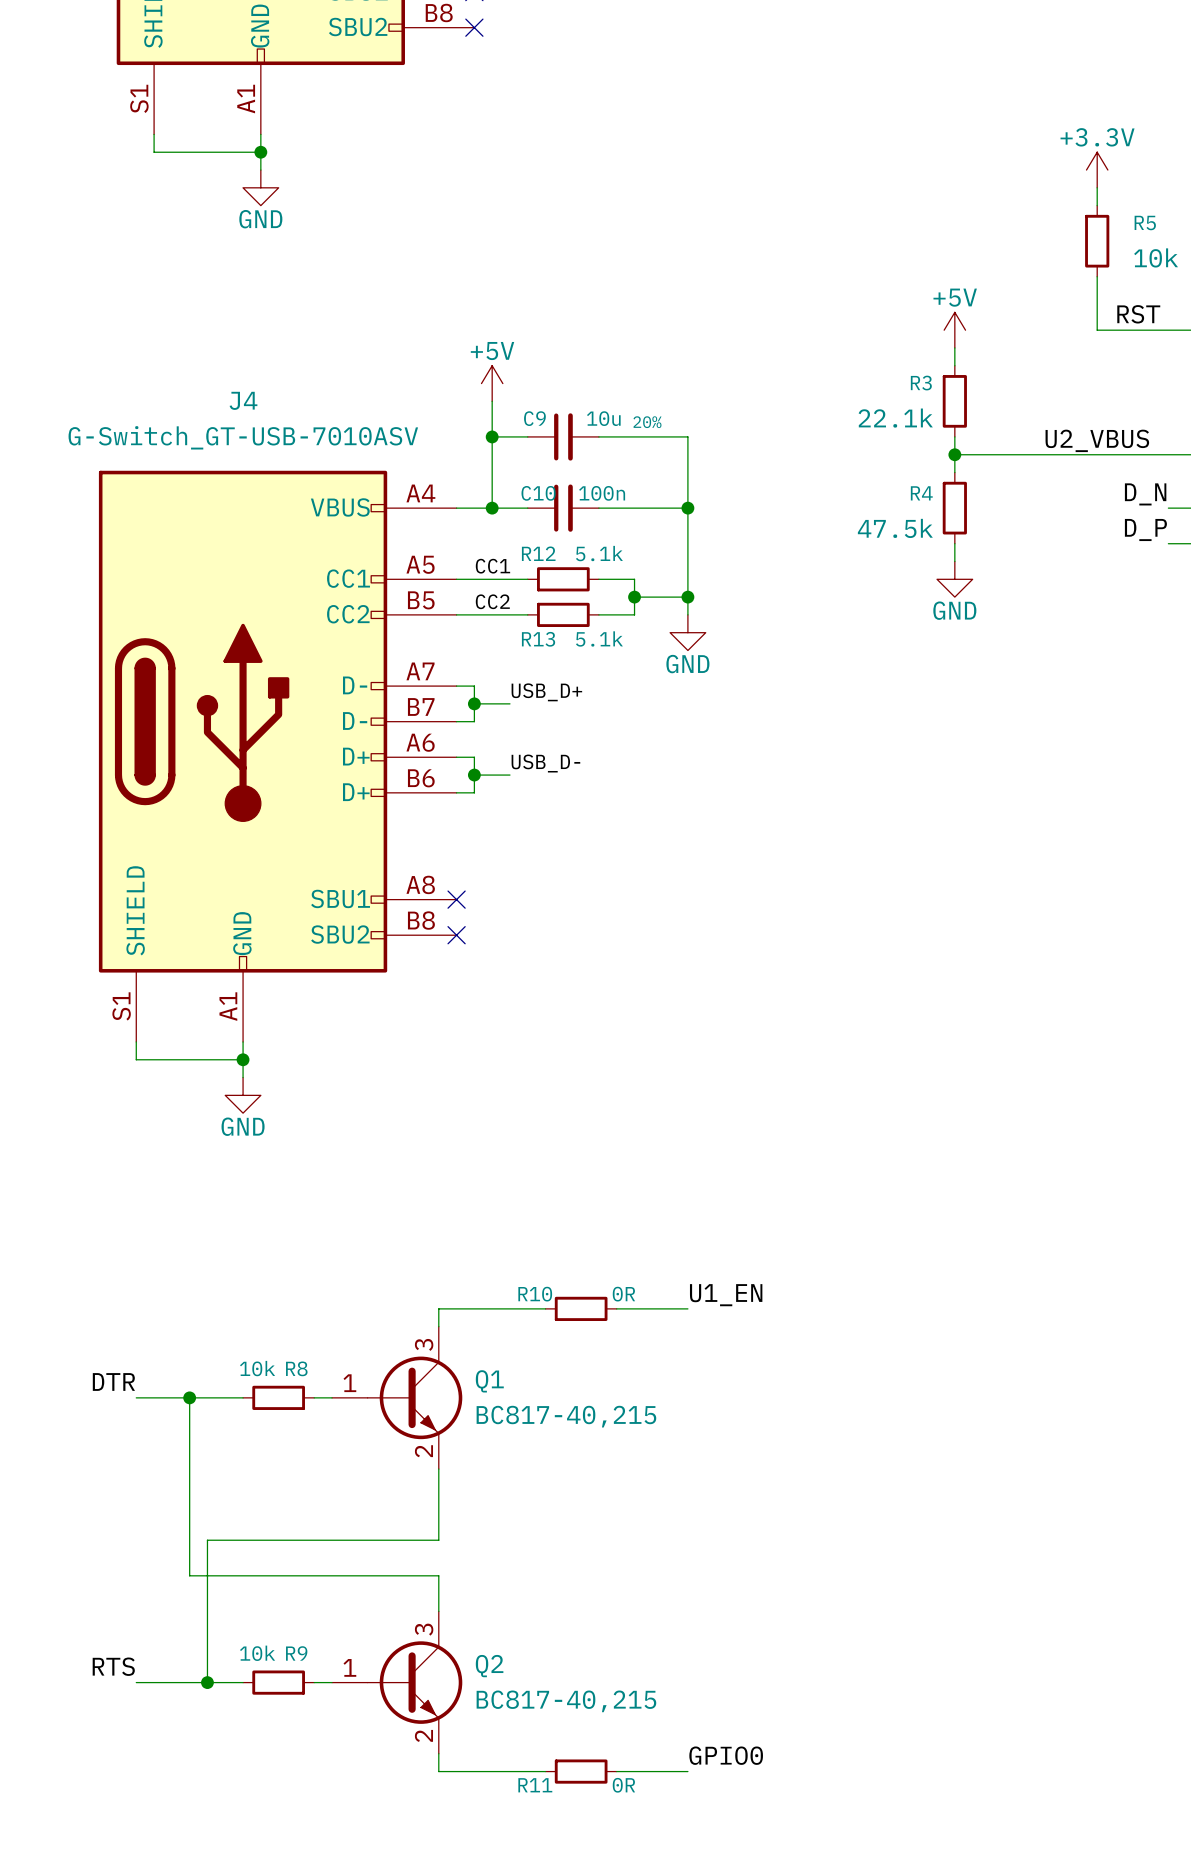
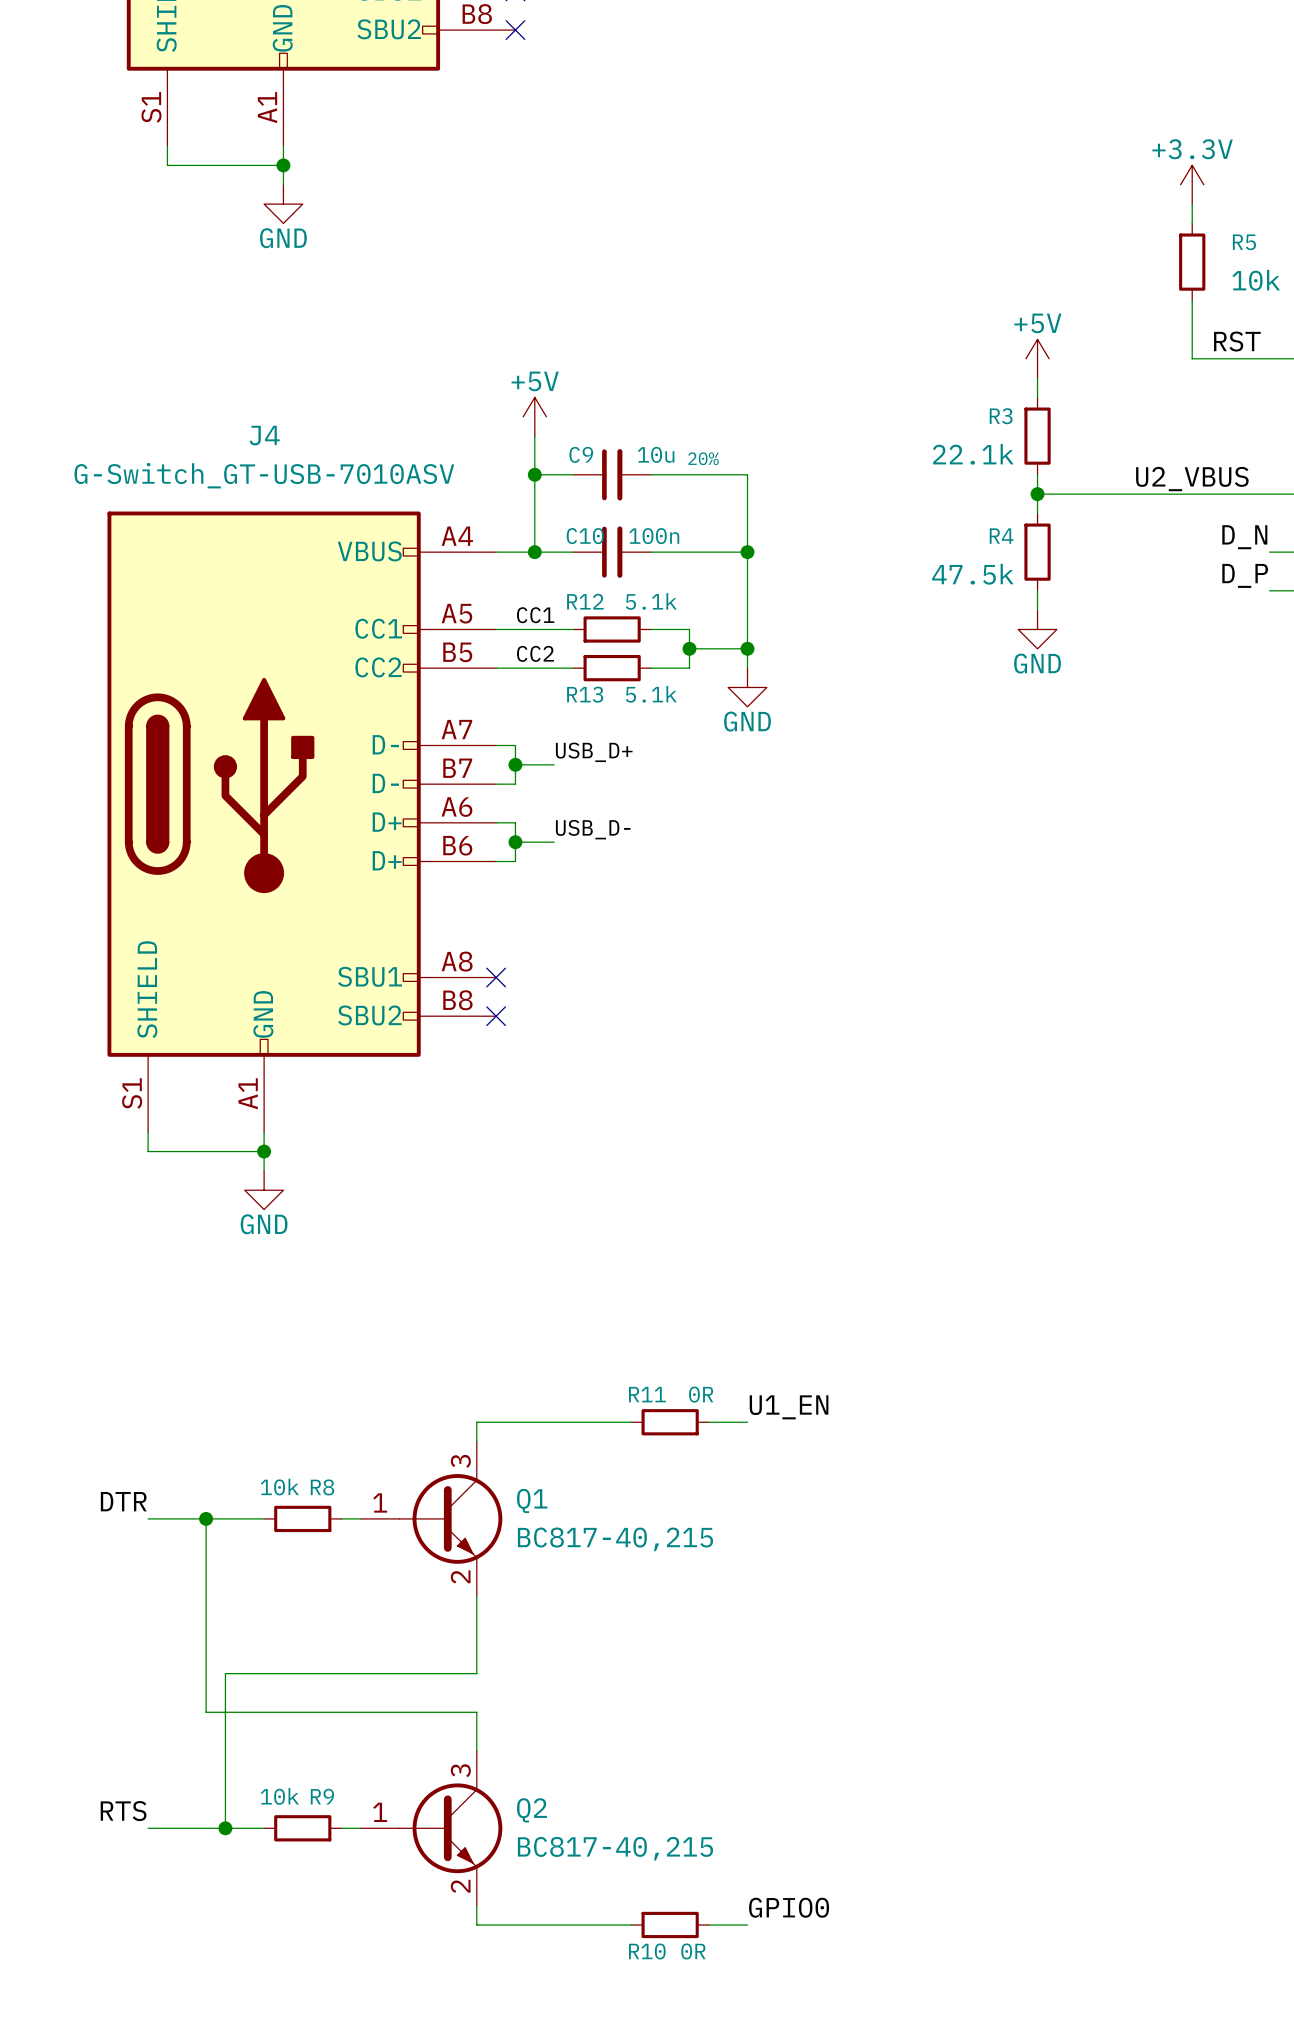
R10 name position: R10 (535, 1294) -> R10 (647, 1951)
R10 value position: 0R (623, 1294) -> 0R (693, 1951)
R10 position: (581, 1308) -> (670, 1924)
wire: (616, 1308) (652, 1308) -> (592, 1422) (631, 1422)
R11 position: (581, 1771) -> (670, 1422)
wire: (616, 1771) (652, 1771) -> (592, 1924) (631, 1924)
R11 name position: R11 (535, 1785) -> R11 (647, 1394)
R11 value position: 0R (623, 1785) -> 0R (701, 1394)

